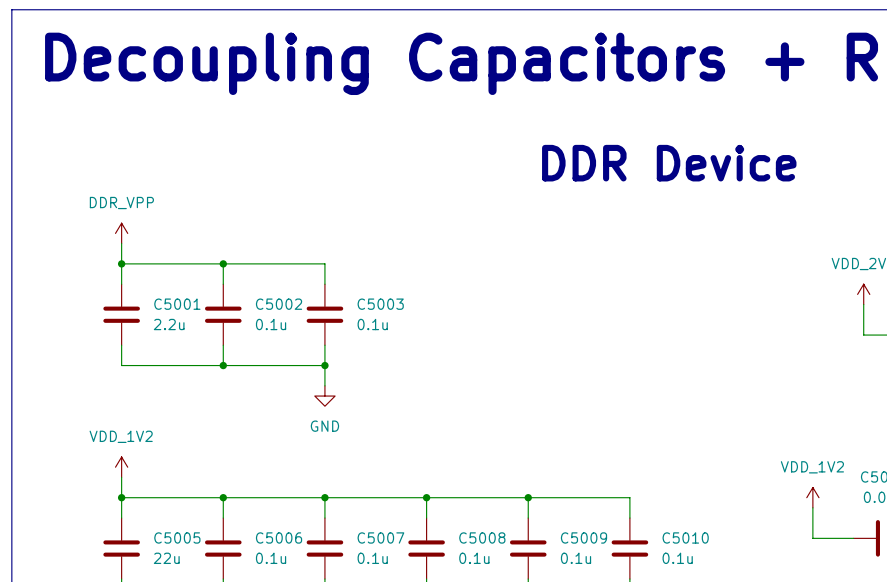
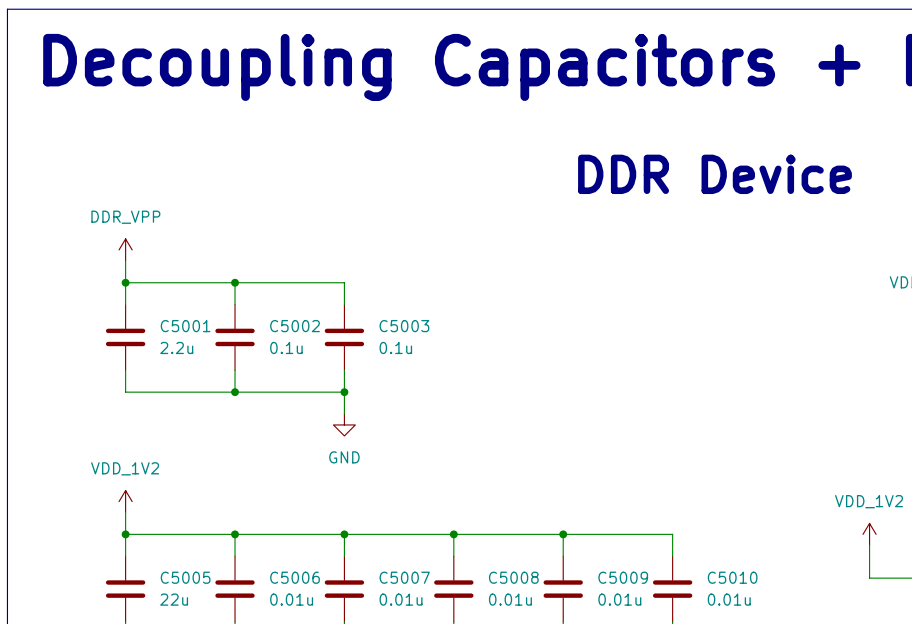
C5006 value: 0.1u (271, 558) -> 0.01u (291, 599)
C5007 value: 0.1u (372, 558) -> 0.01u (401, 599)
C5008 value: 0.1u (474, 558) -> 0.01u (510, 599)
C5009 value: 0.1u (576, 558) -> 0.01u (619, 599)
C5010 value: 0.1u (677, 558) -> 0.01u (729, 599)

